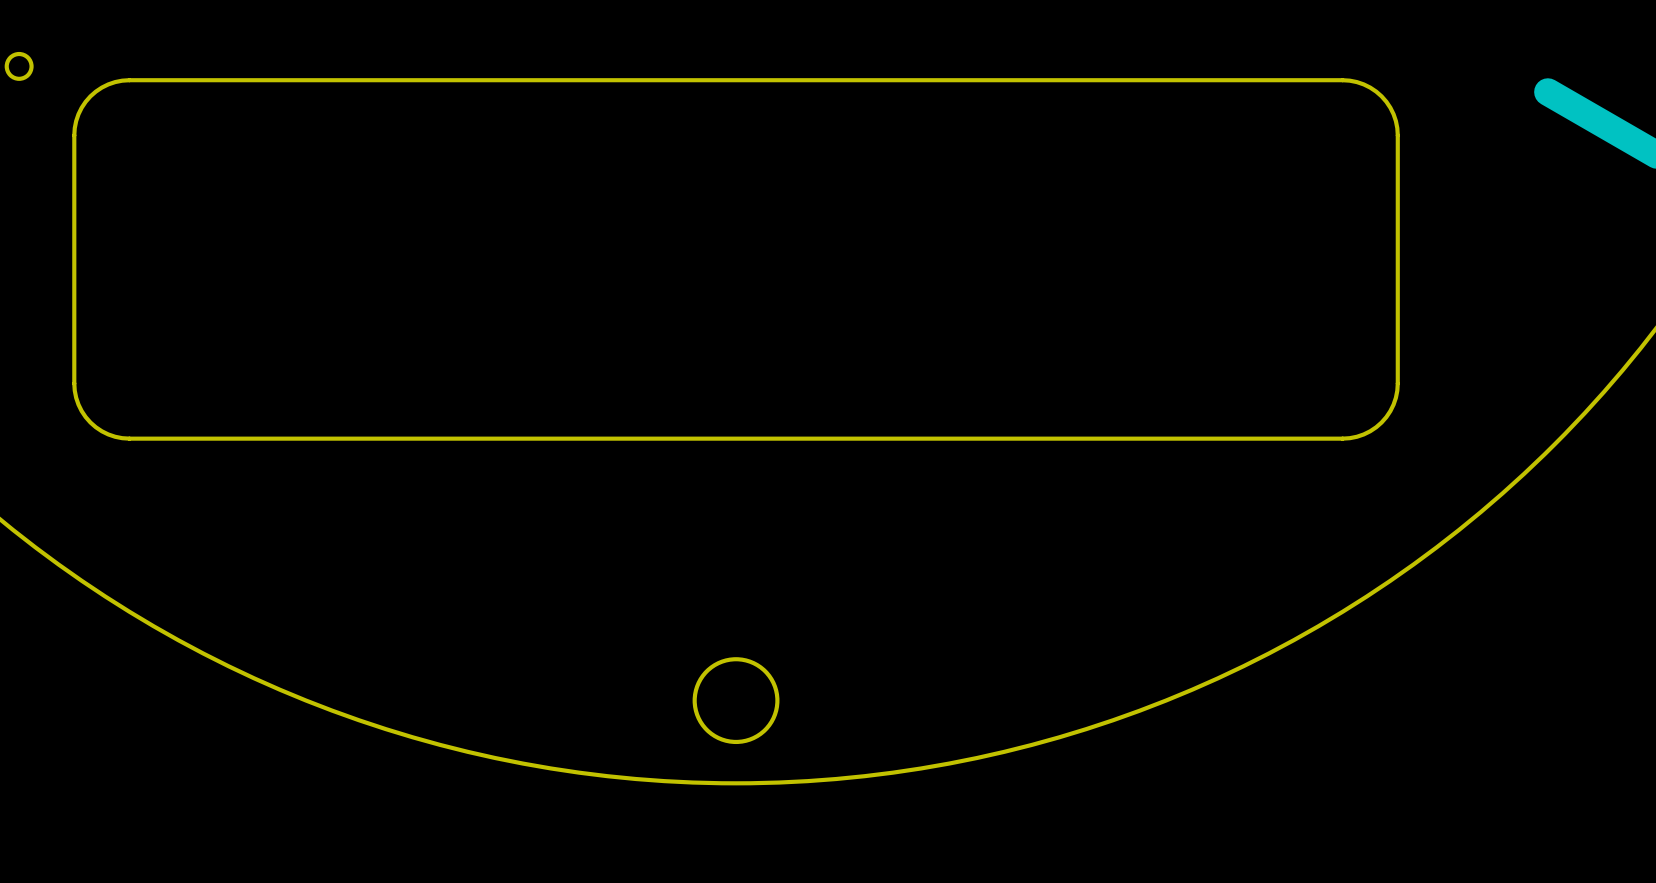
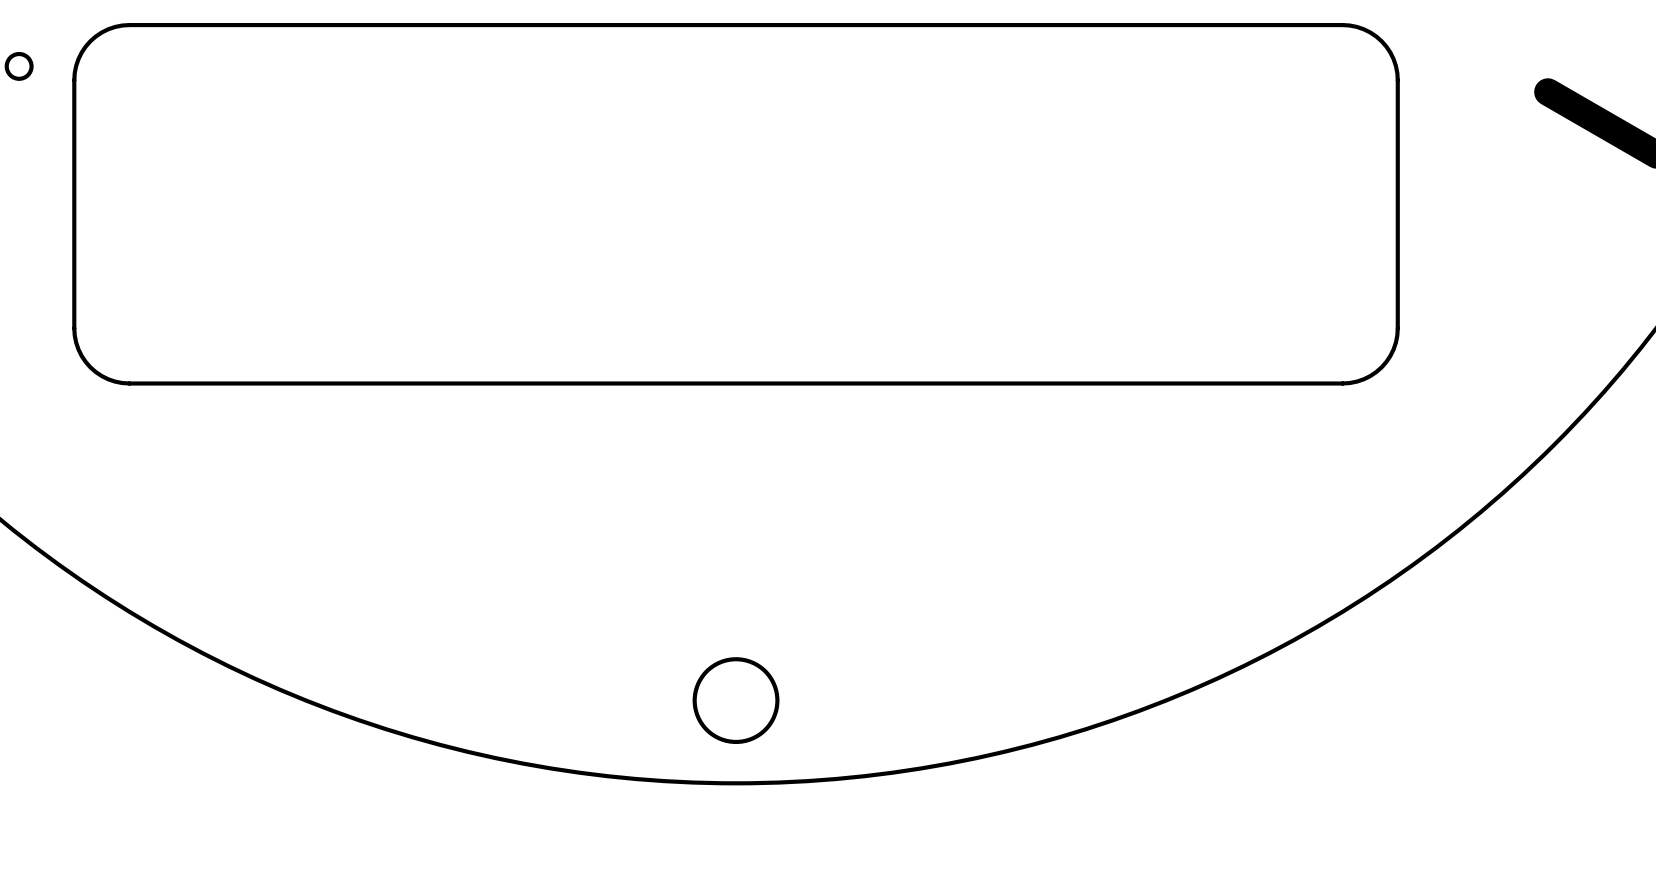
board edge: (74, 135) (78, 114) (90, 96) (108, 84) (129, 80) (1342, 80) (1363, 84) (1381, 96) (1393, 114) (1397, 135) -> (74, 135) (74, 73) (81, 52) (90, 41) (101, 32) (115, 26) (129, 25) (1349, 25) (1363, 29) (1376, 36) (1386, 46) (1393, 59) (1397, 80) (1397, 135)
board edge: (74, 328) (74, 390) (81, 411) (90, 422) (101, 431) (115, 436) (129, 438) (1349, 438) (1363, 434) (1376, 427) (1386, 417) (1393, 404) (1397, 383) (1397, 328) -> (74, 328) (78, 349) (90, 367) (108, 379) (129, 383) (1342, 383) (1363, 379) (1381, 367) (1393, 349) (1397, 328)

